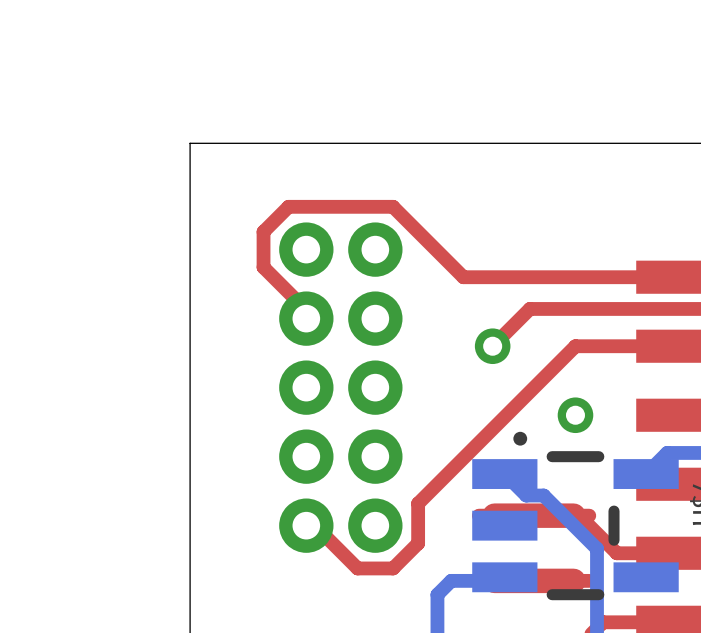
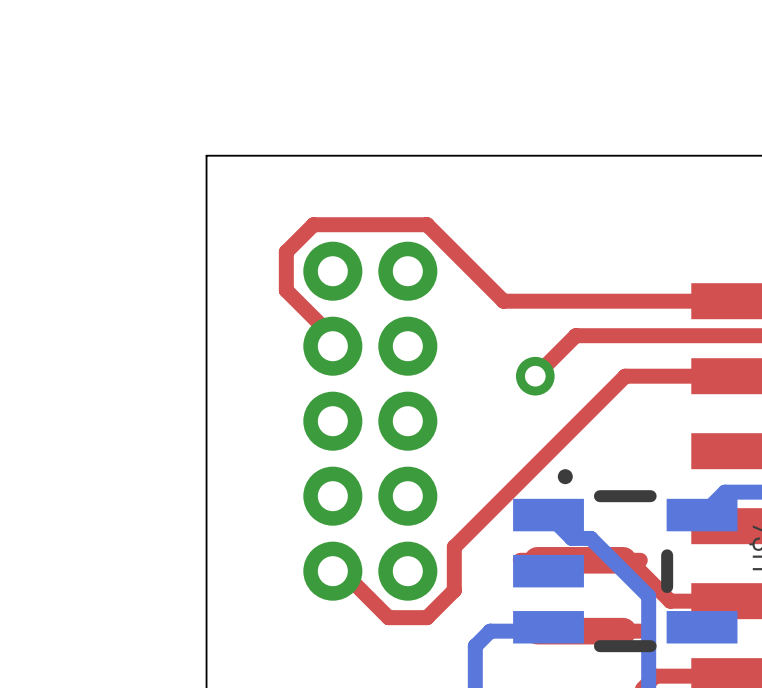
via: (575, 415) -> none

